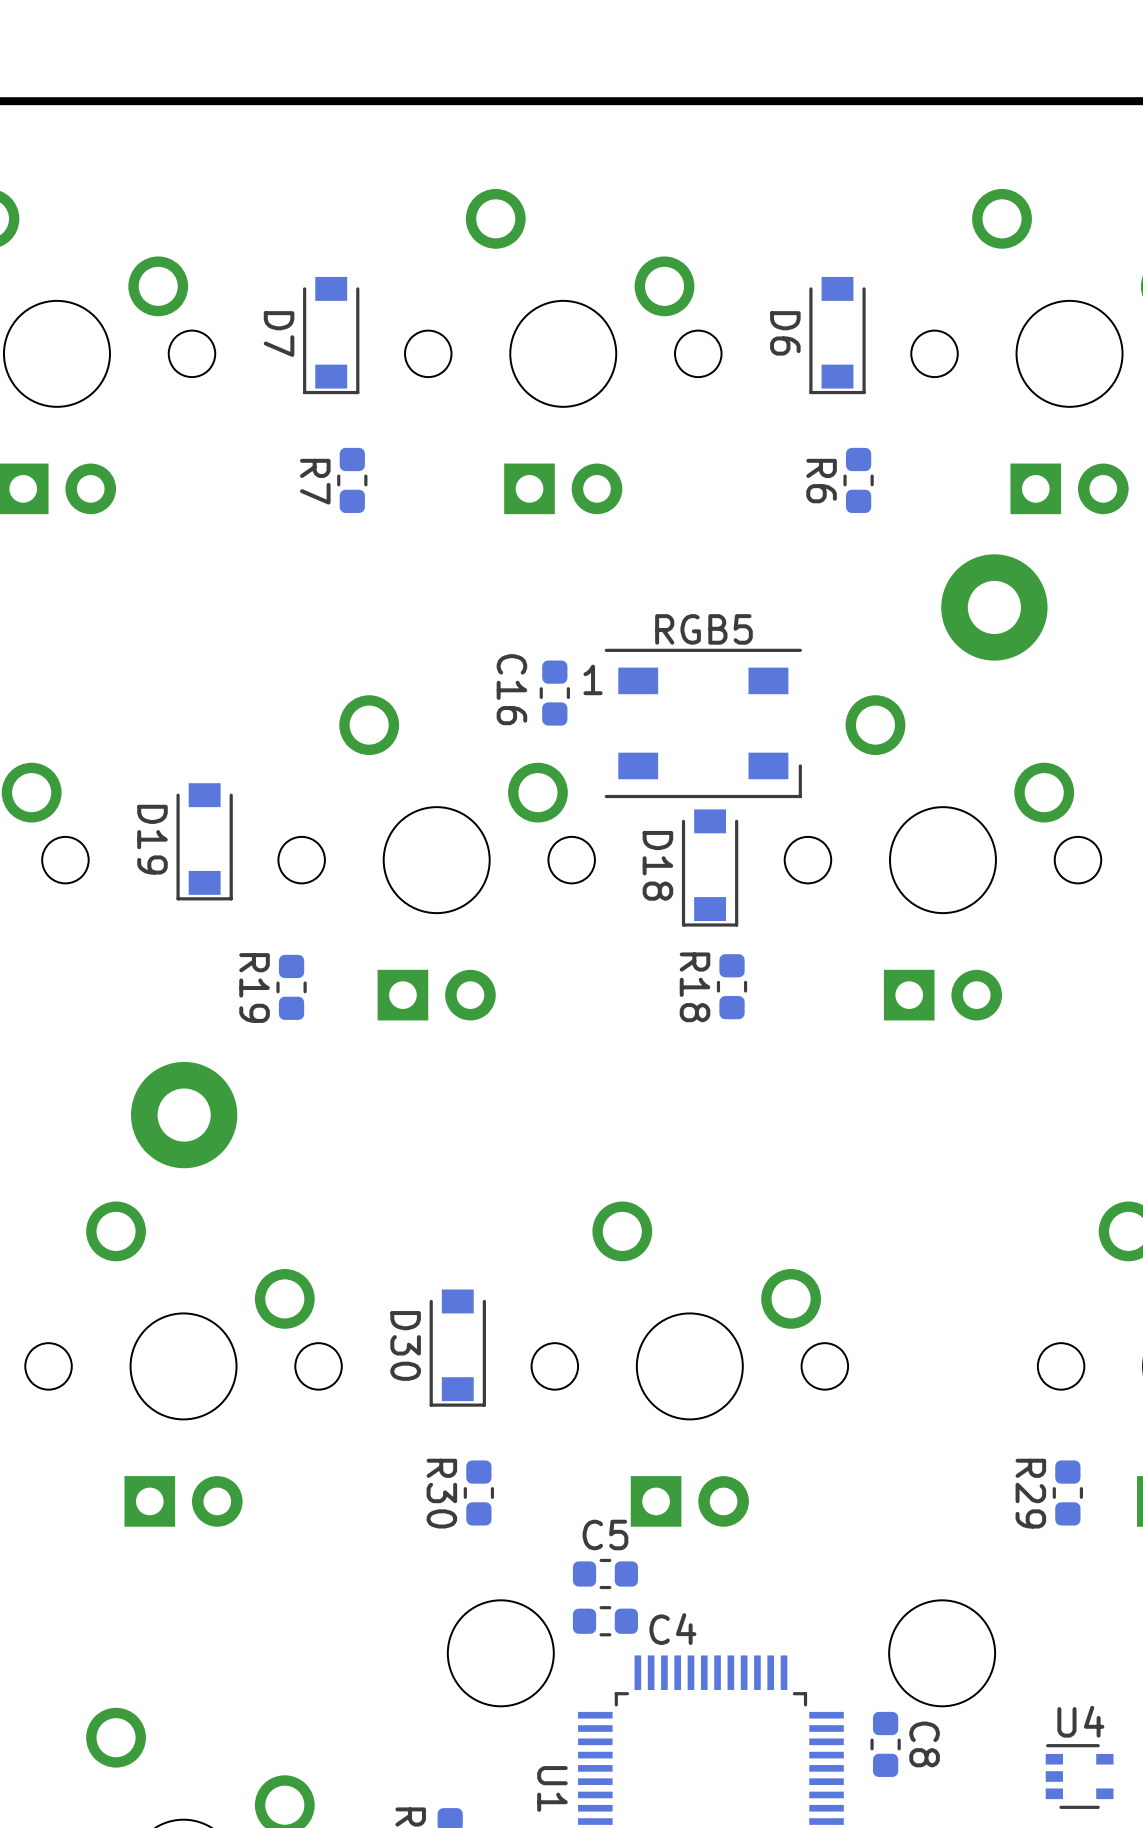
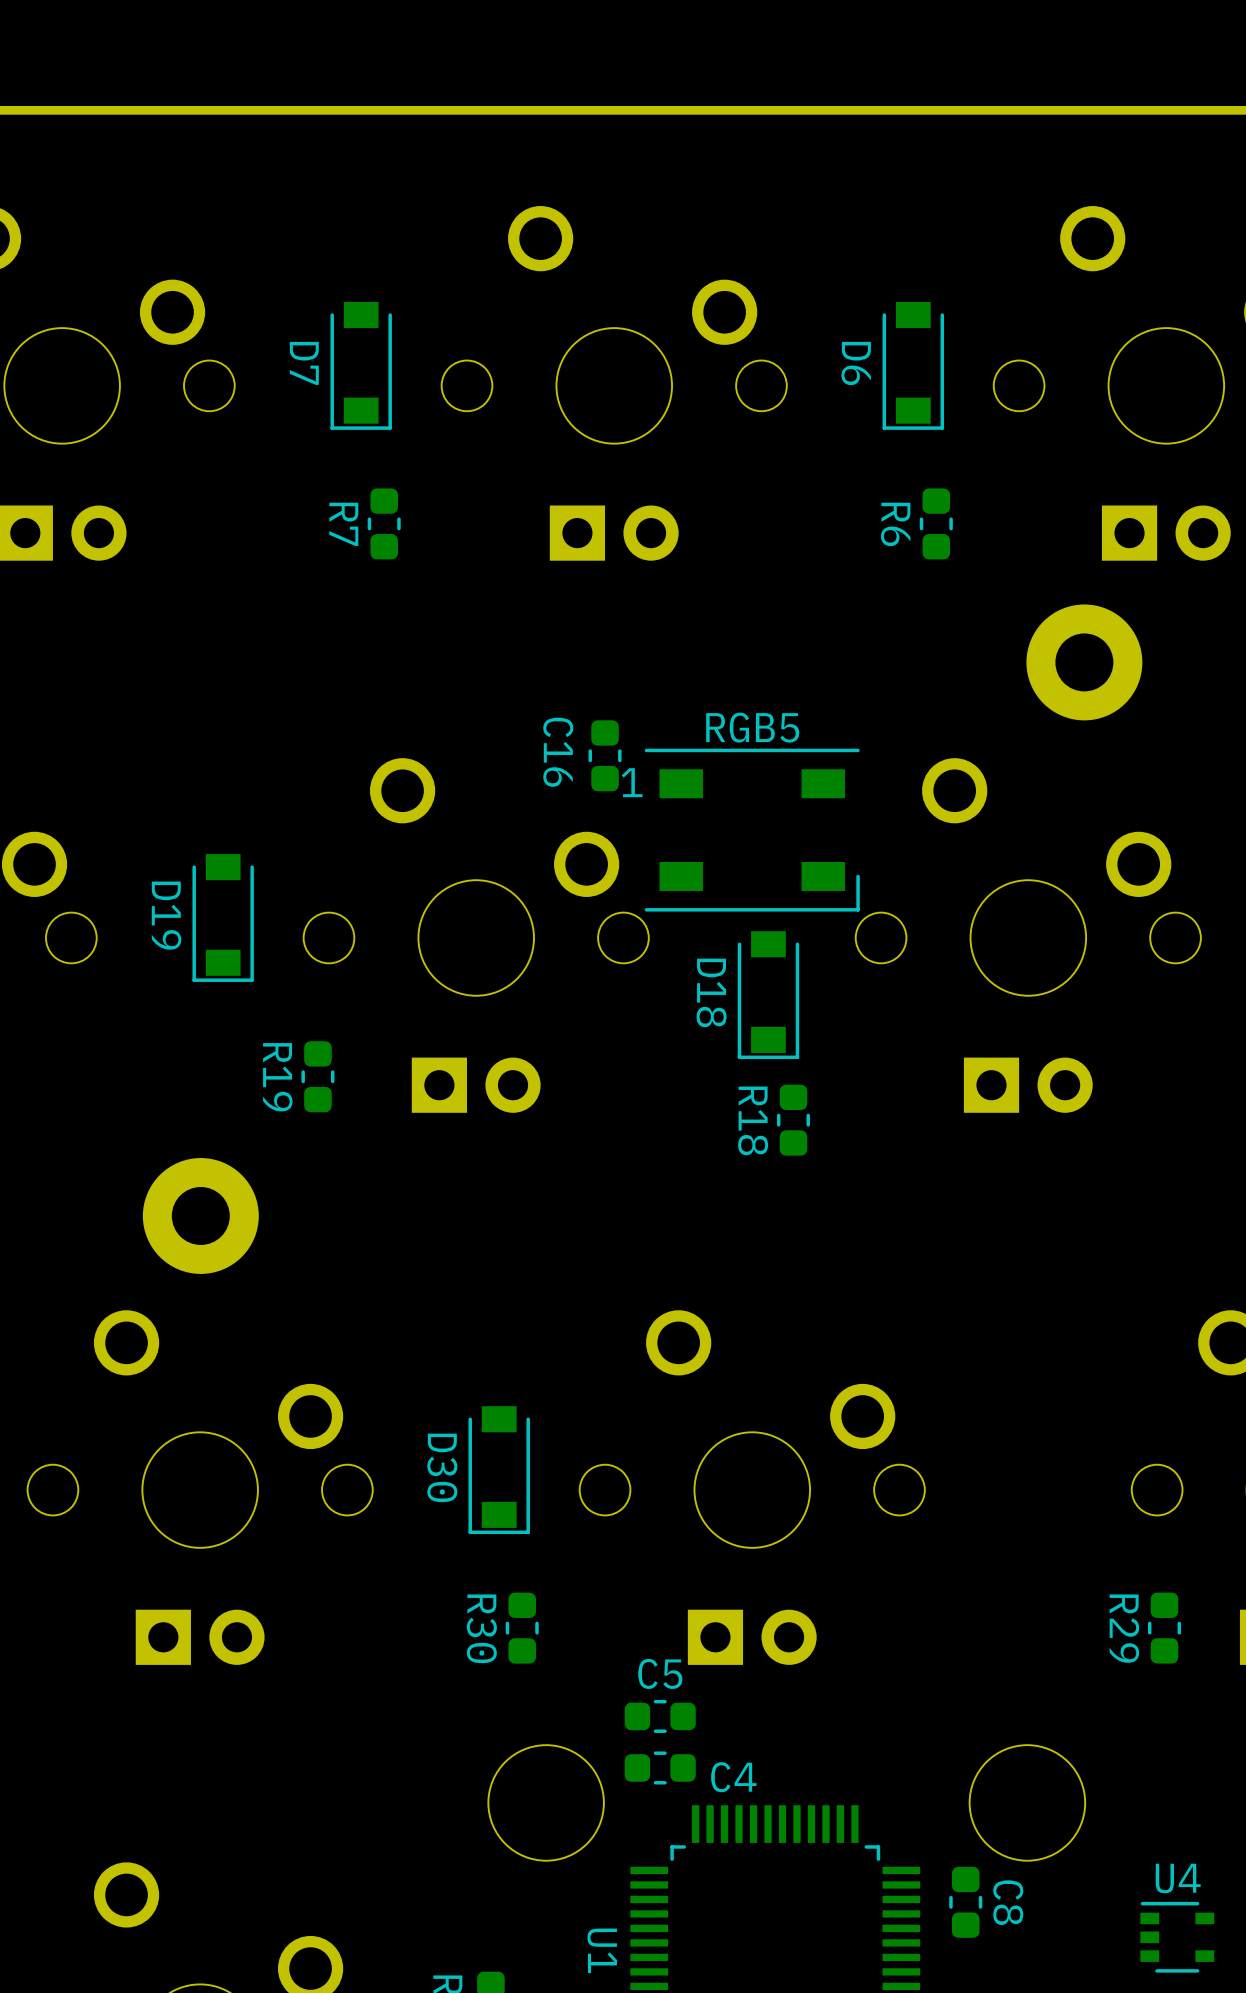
RGB5 position: (703, 723) -> (752, 830)
D18 position: (710, 867) -> (768, 995)
R18 position: (732, 986) -> (793, 1120)

